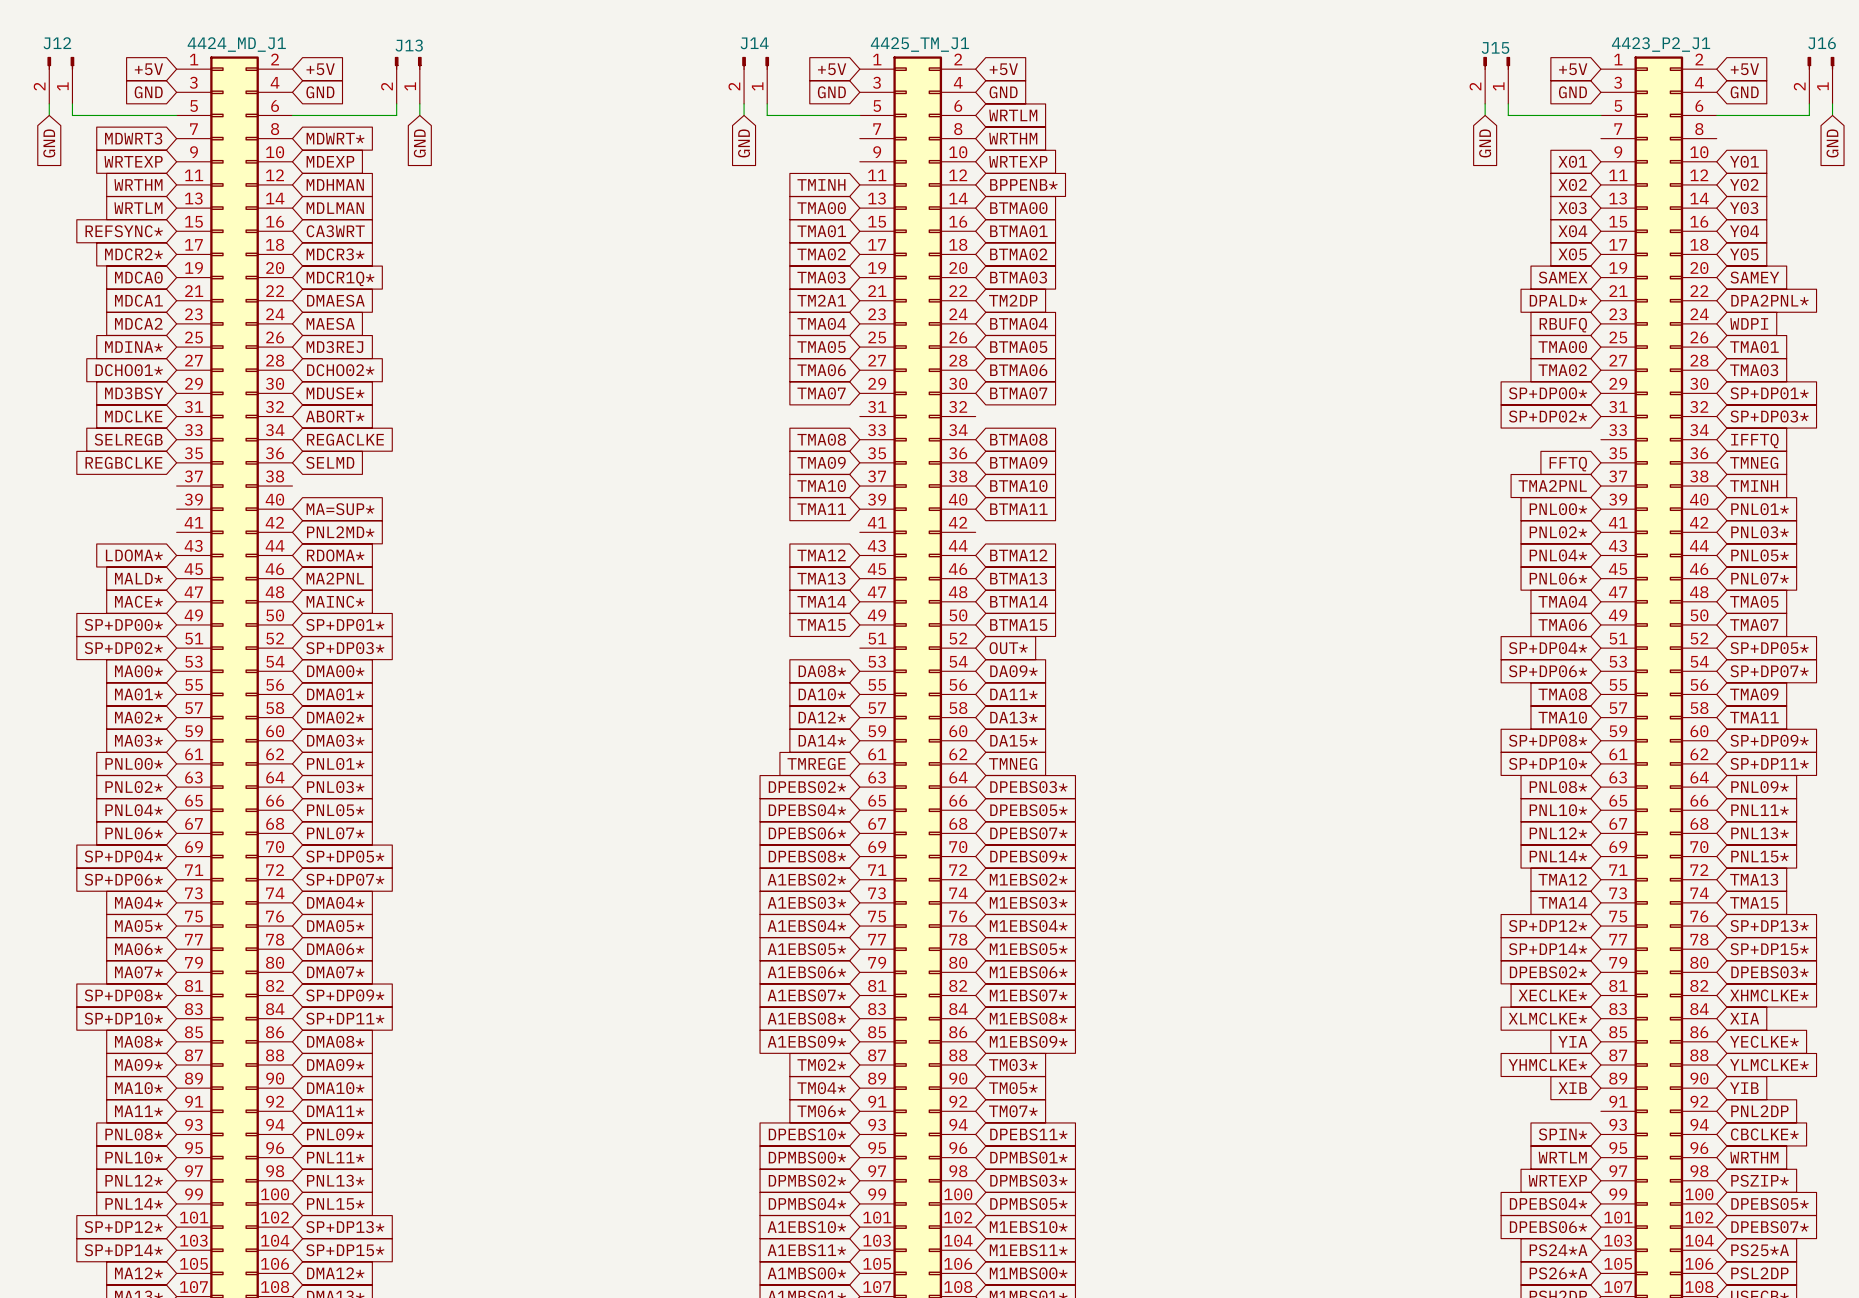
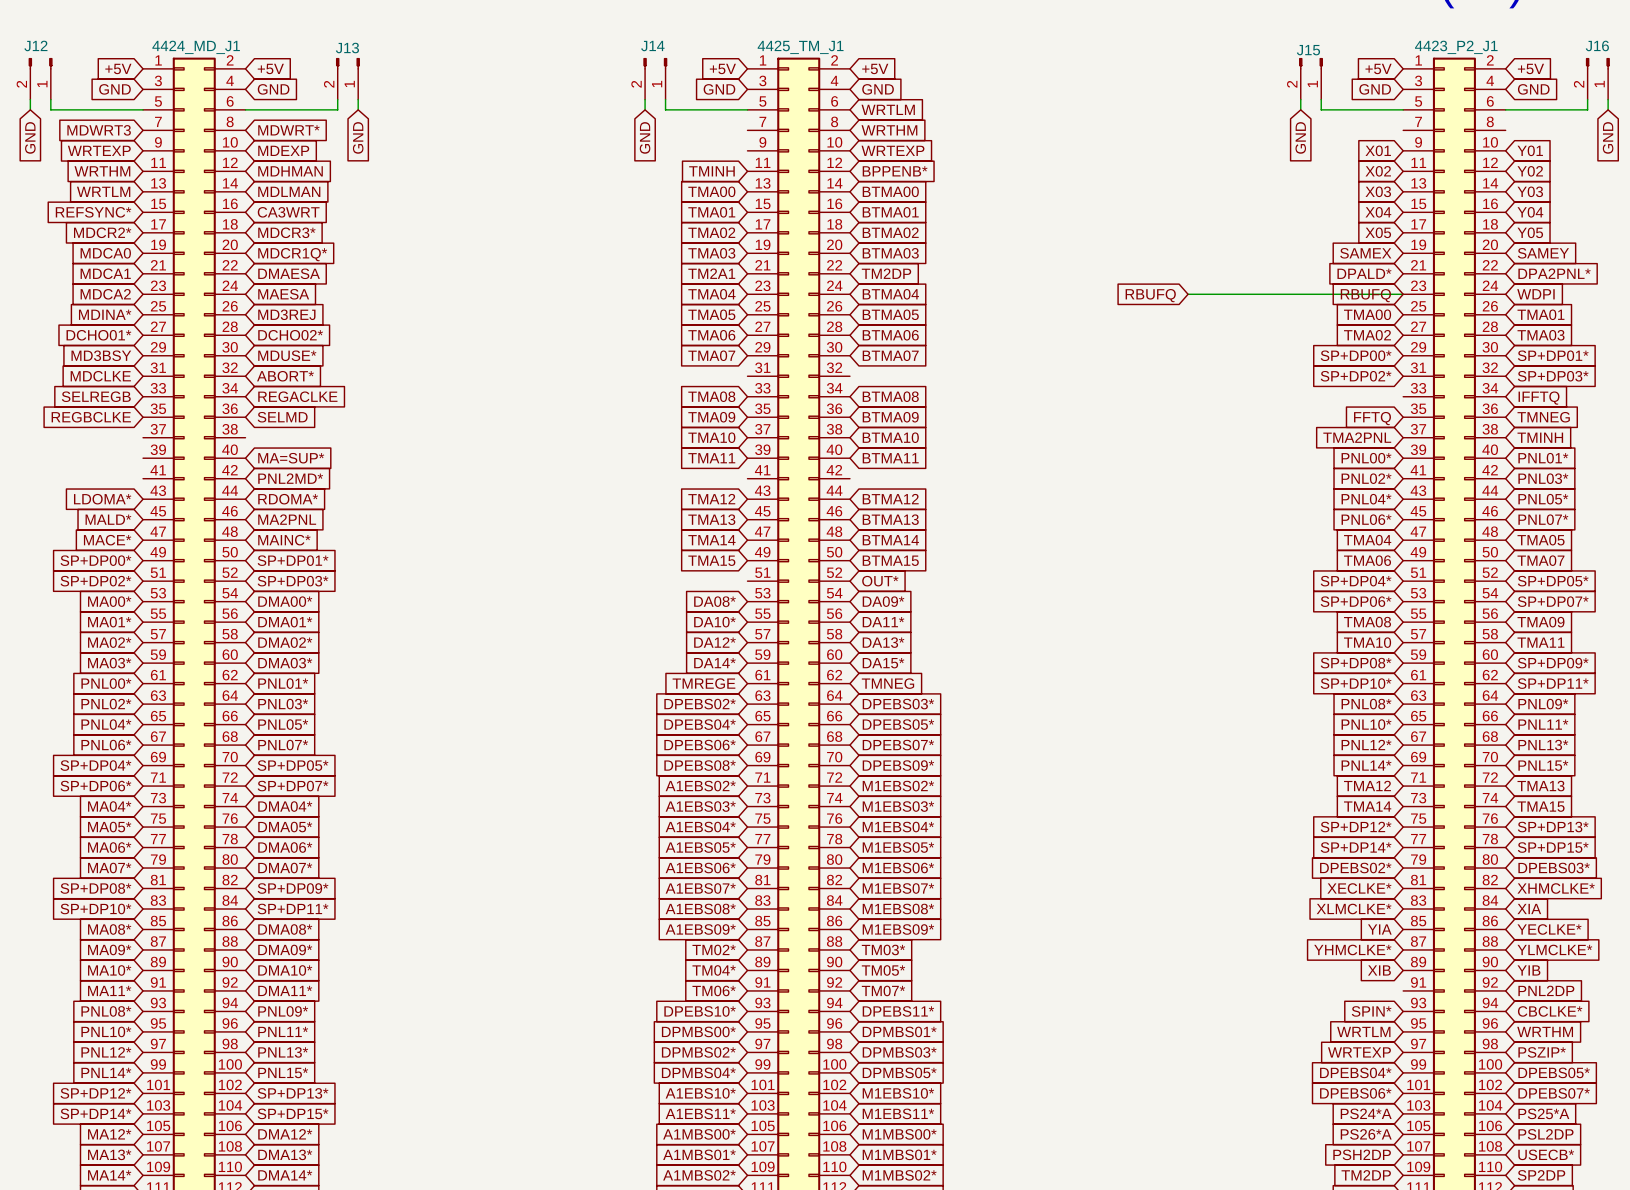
wire: none -> (1188, 294) (1403, 294)
global label: none -> RBUFQ (1150, 295)

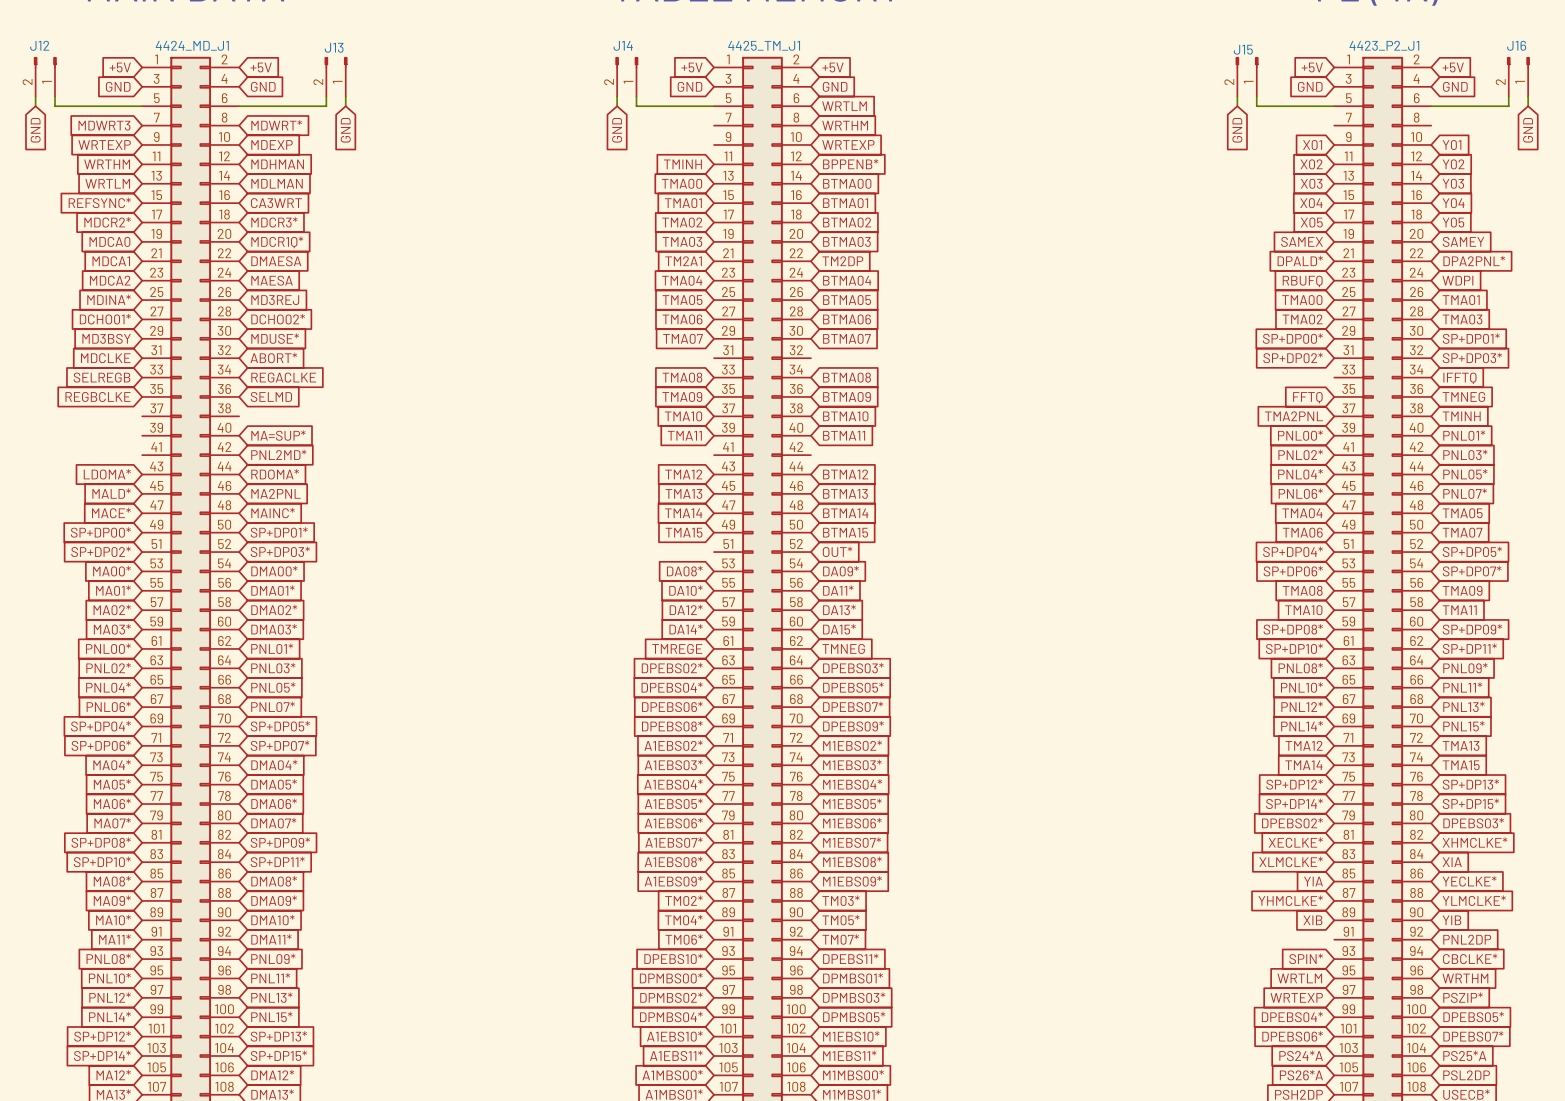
wire: (1188, 294) (1403, 294) -> none
global label: RBUFQ (1150, 295) -> none

